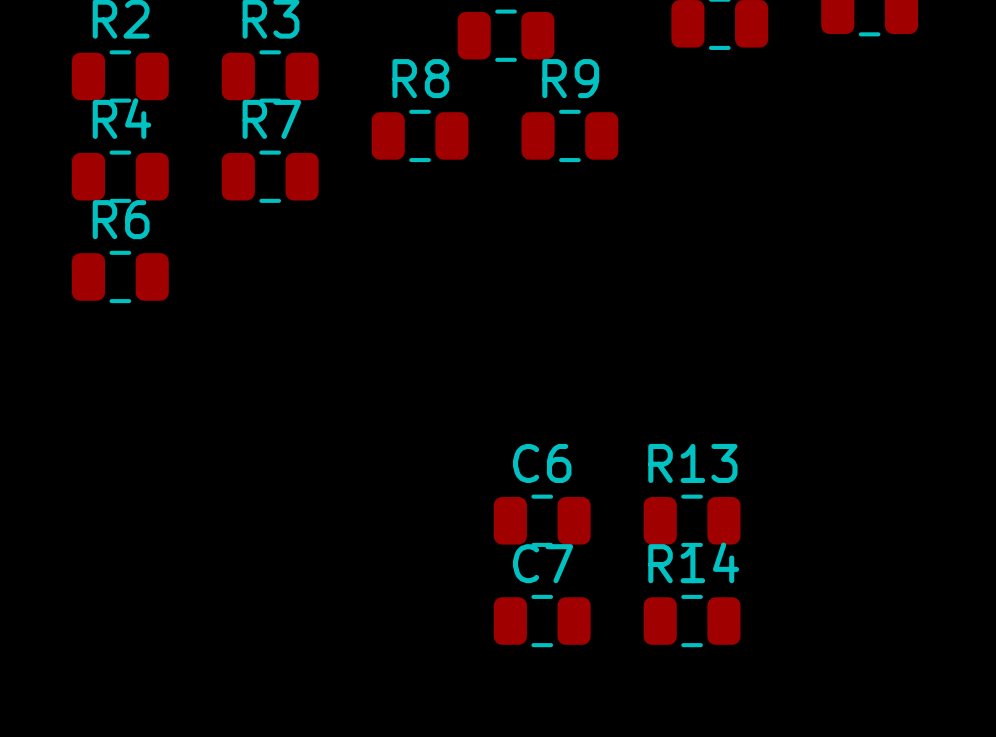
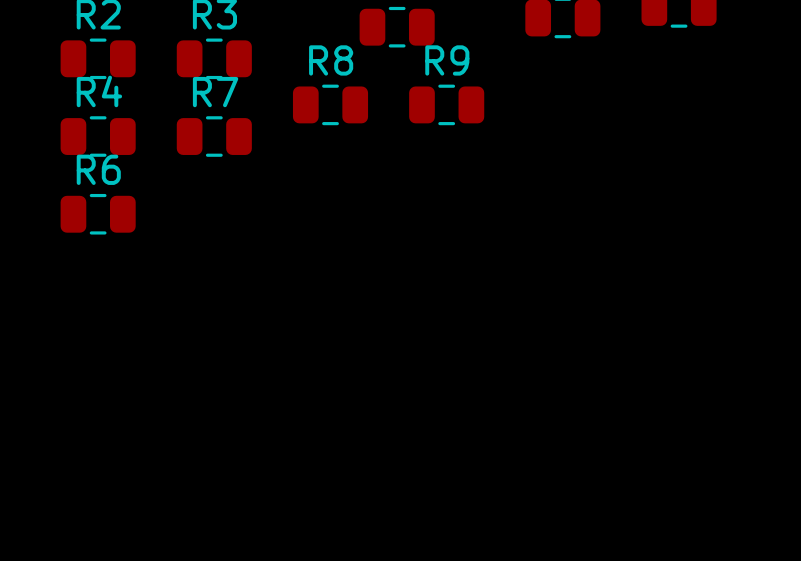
C6: (542, 520) -> none
R13: (692, 520) -> none
C7: (542, 621) -> none
R14: (692, 621) -> none

